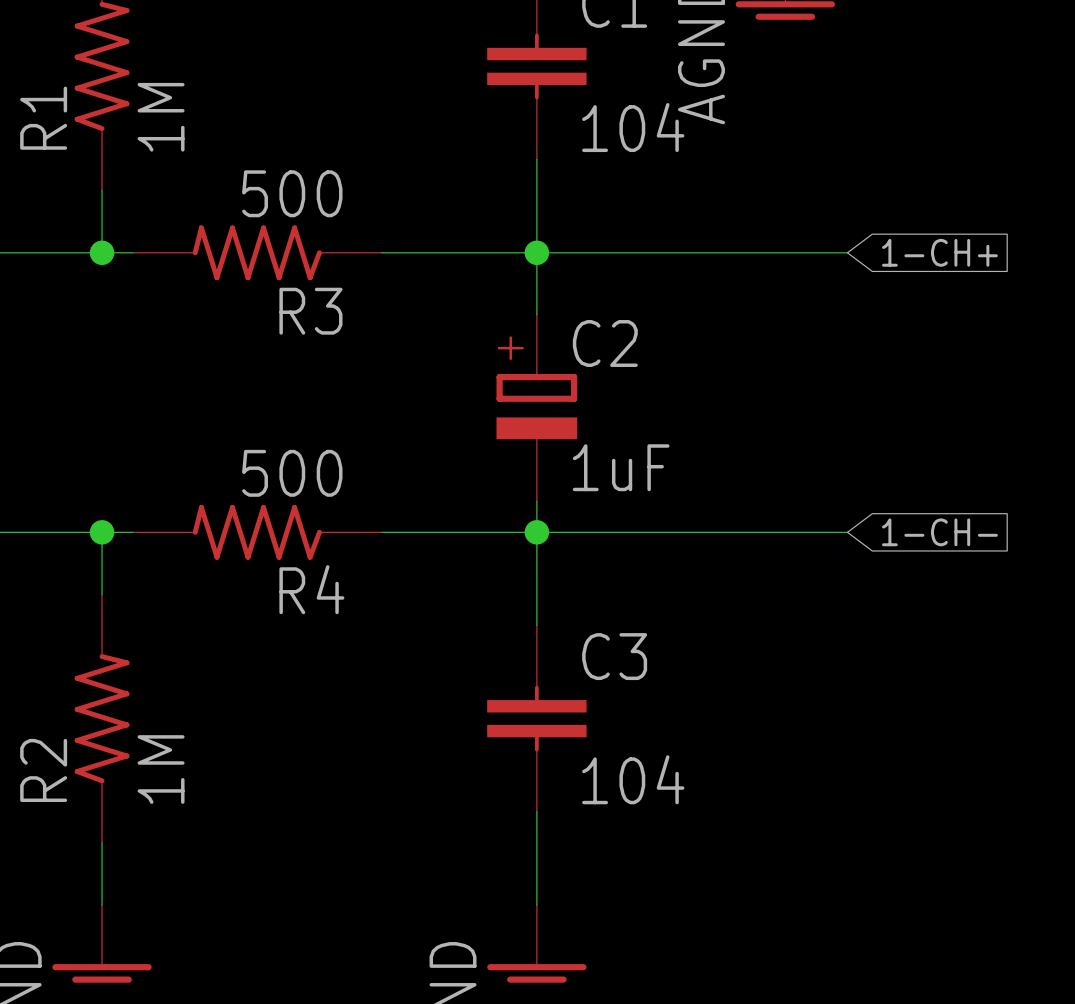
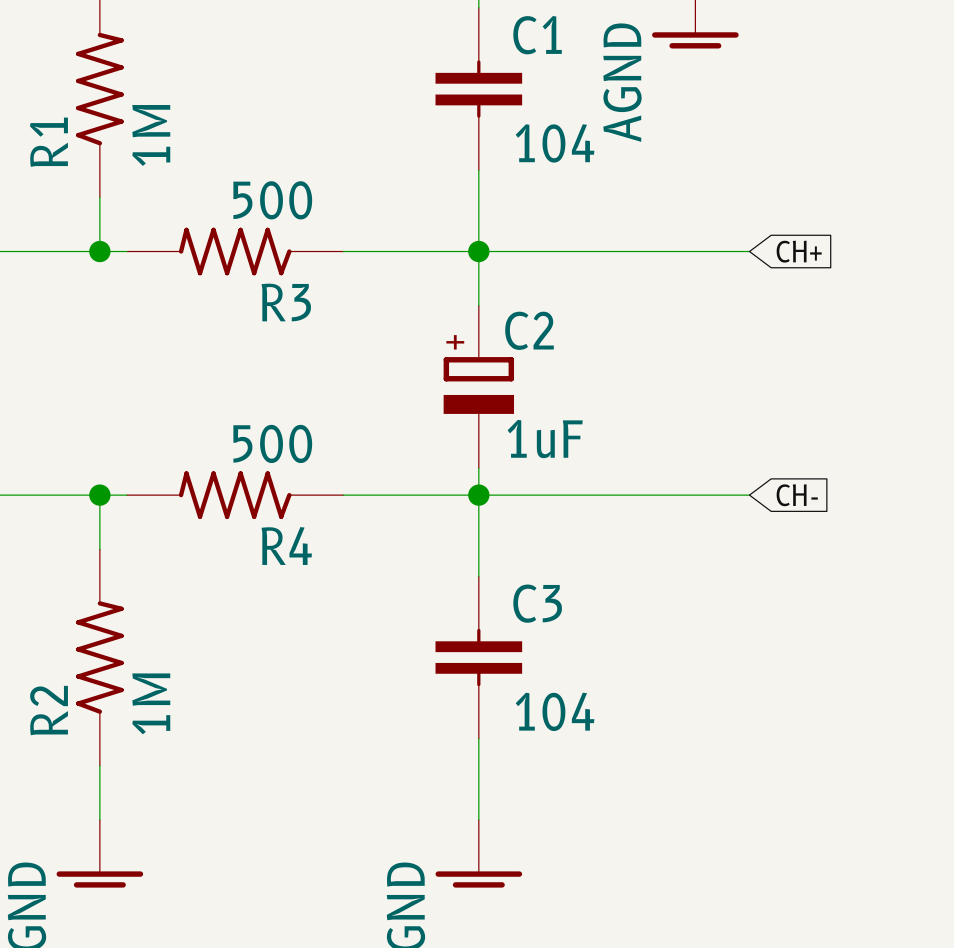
global label: 1-CH+ (939, 252) -> CH+ (799, 251)
global label: 1-CH- (939, 532) -> CH- (797, 495)

